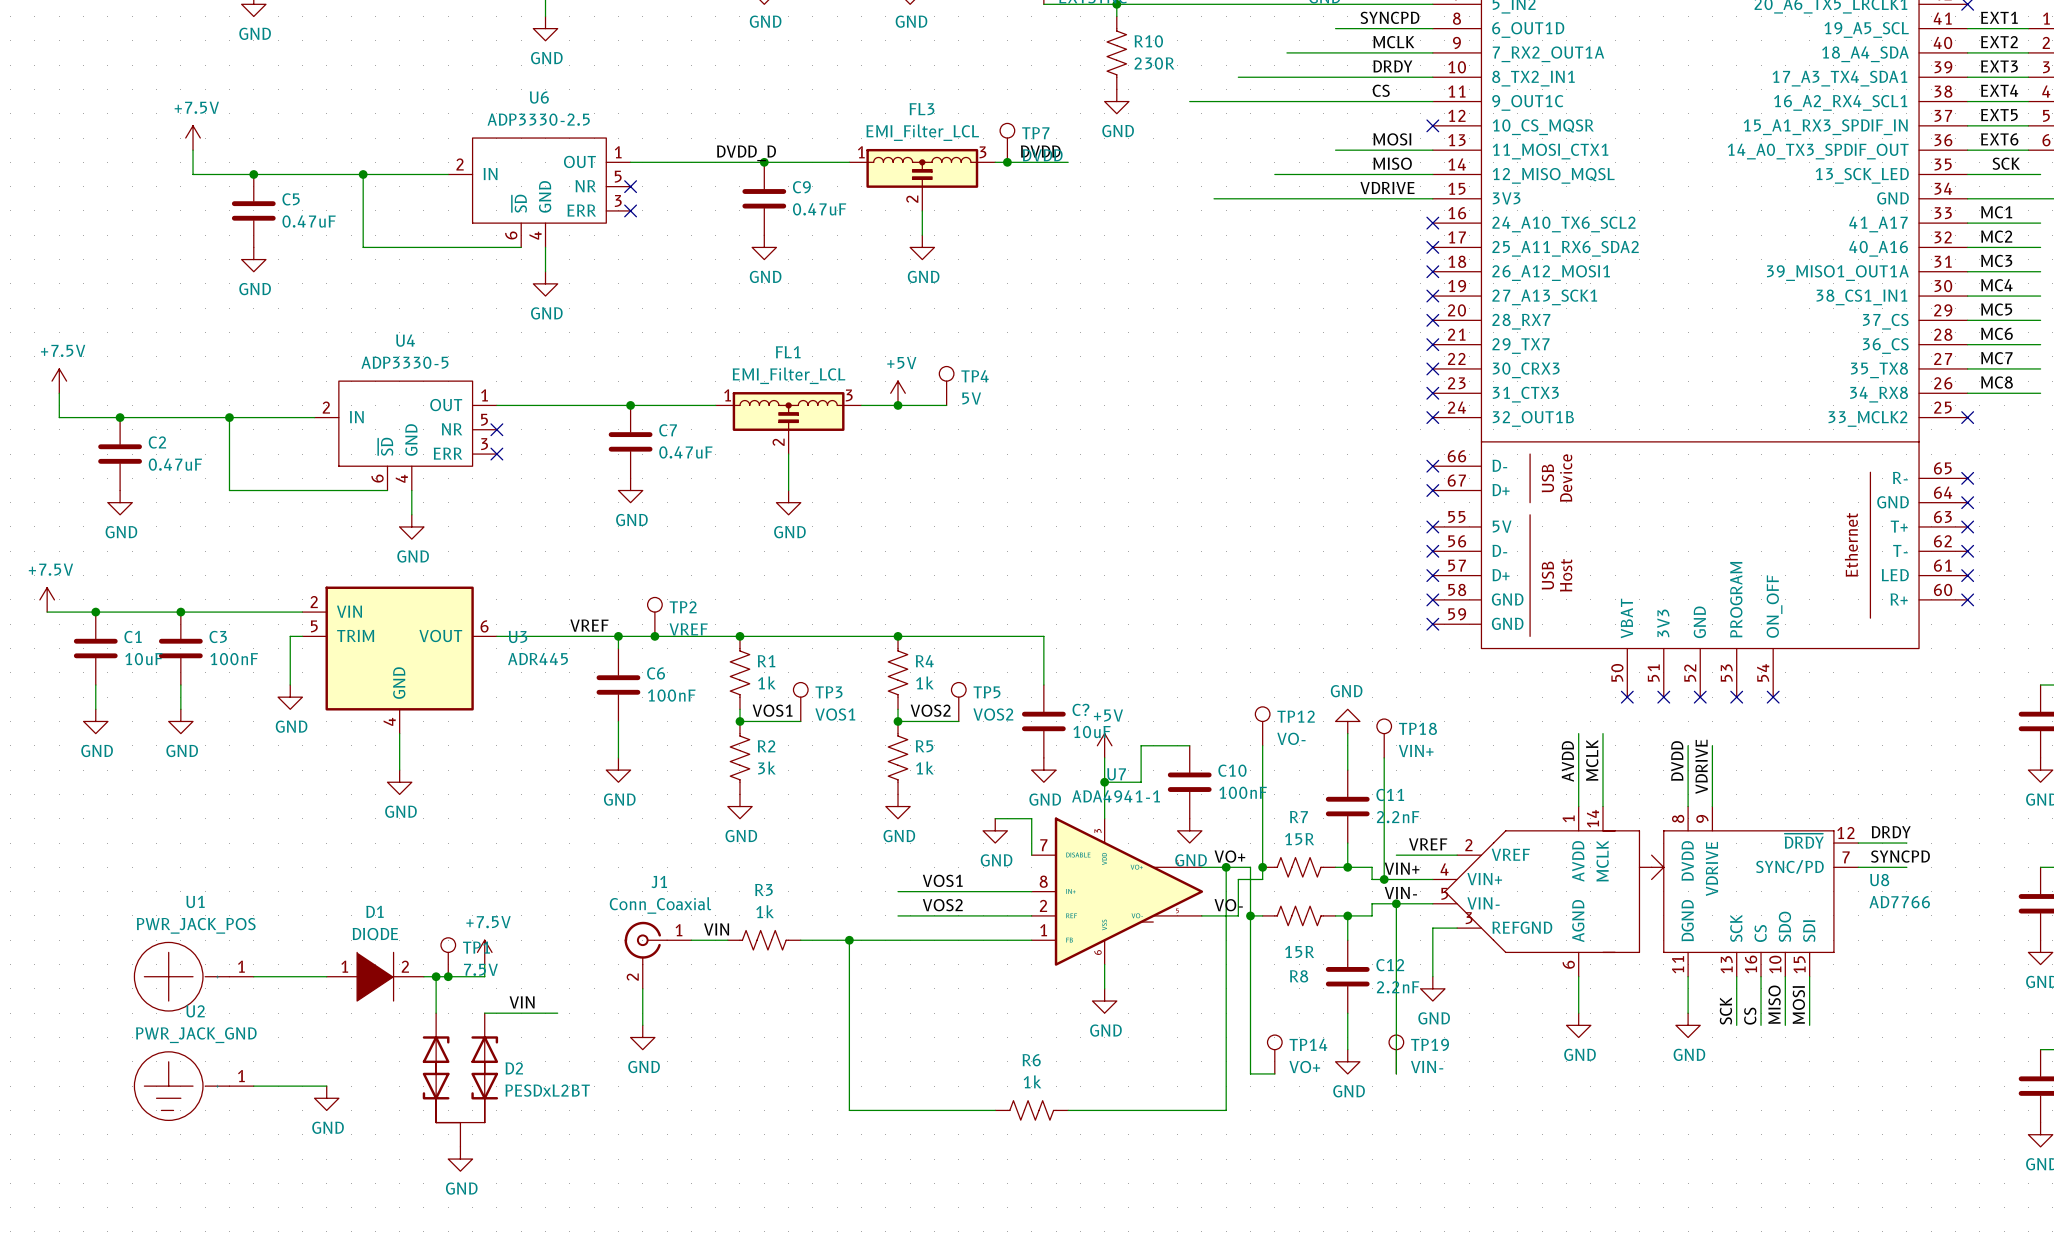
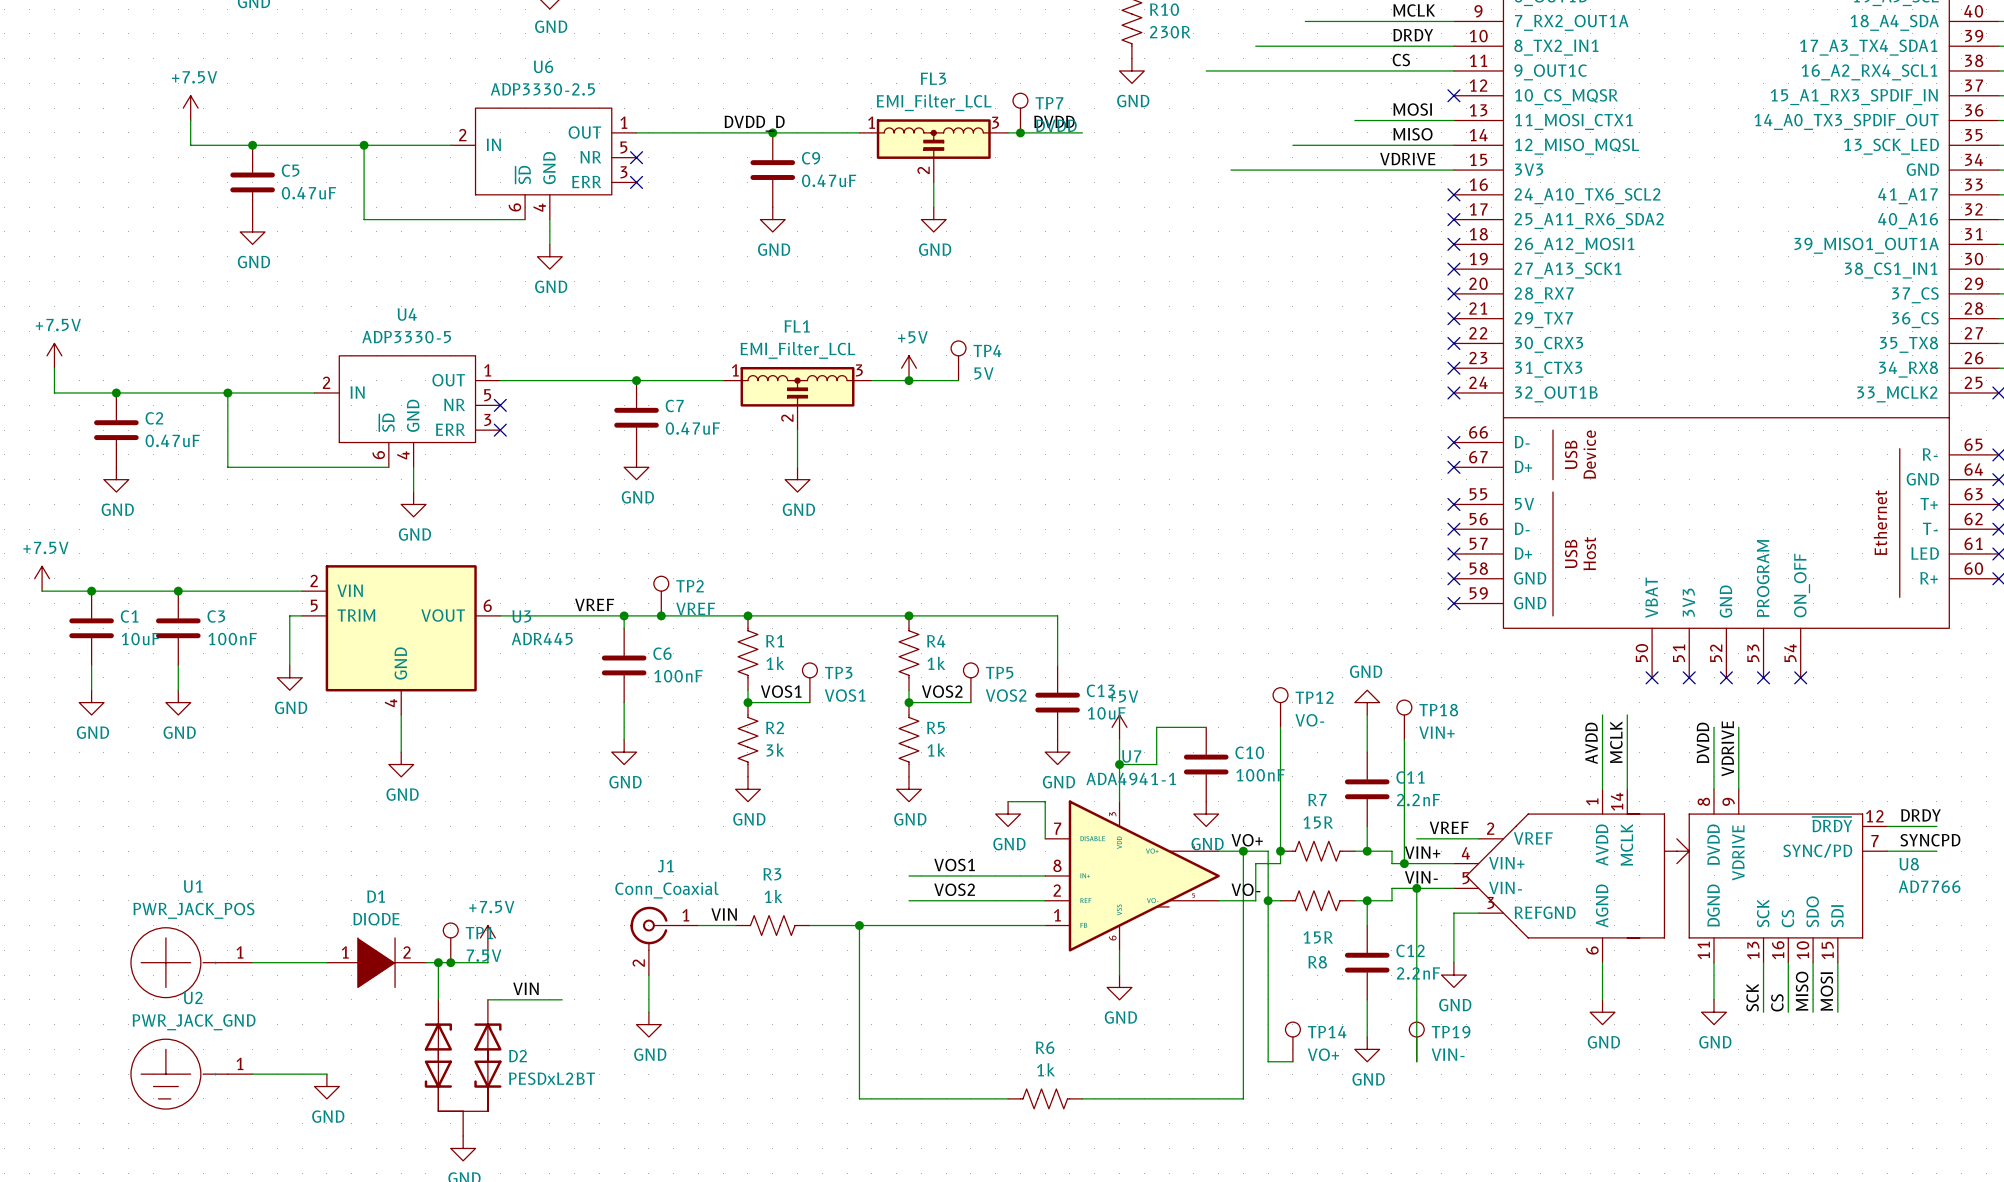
C? name: C? (1080, 709) -> C13 (1100, 690)

